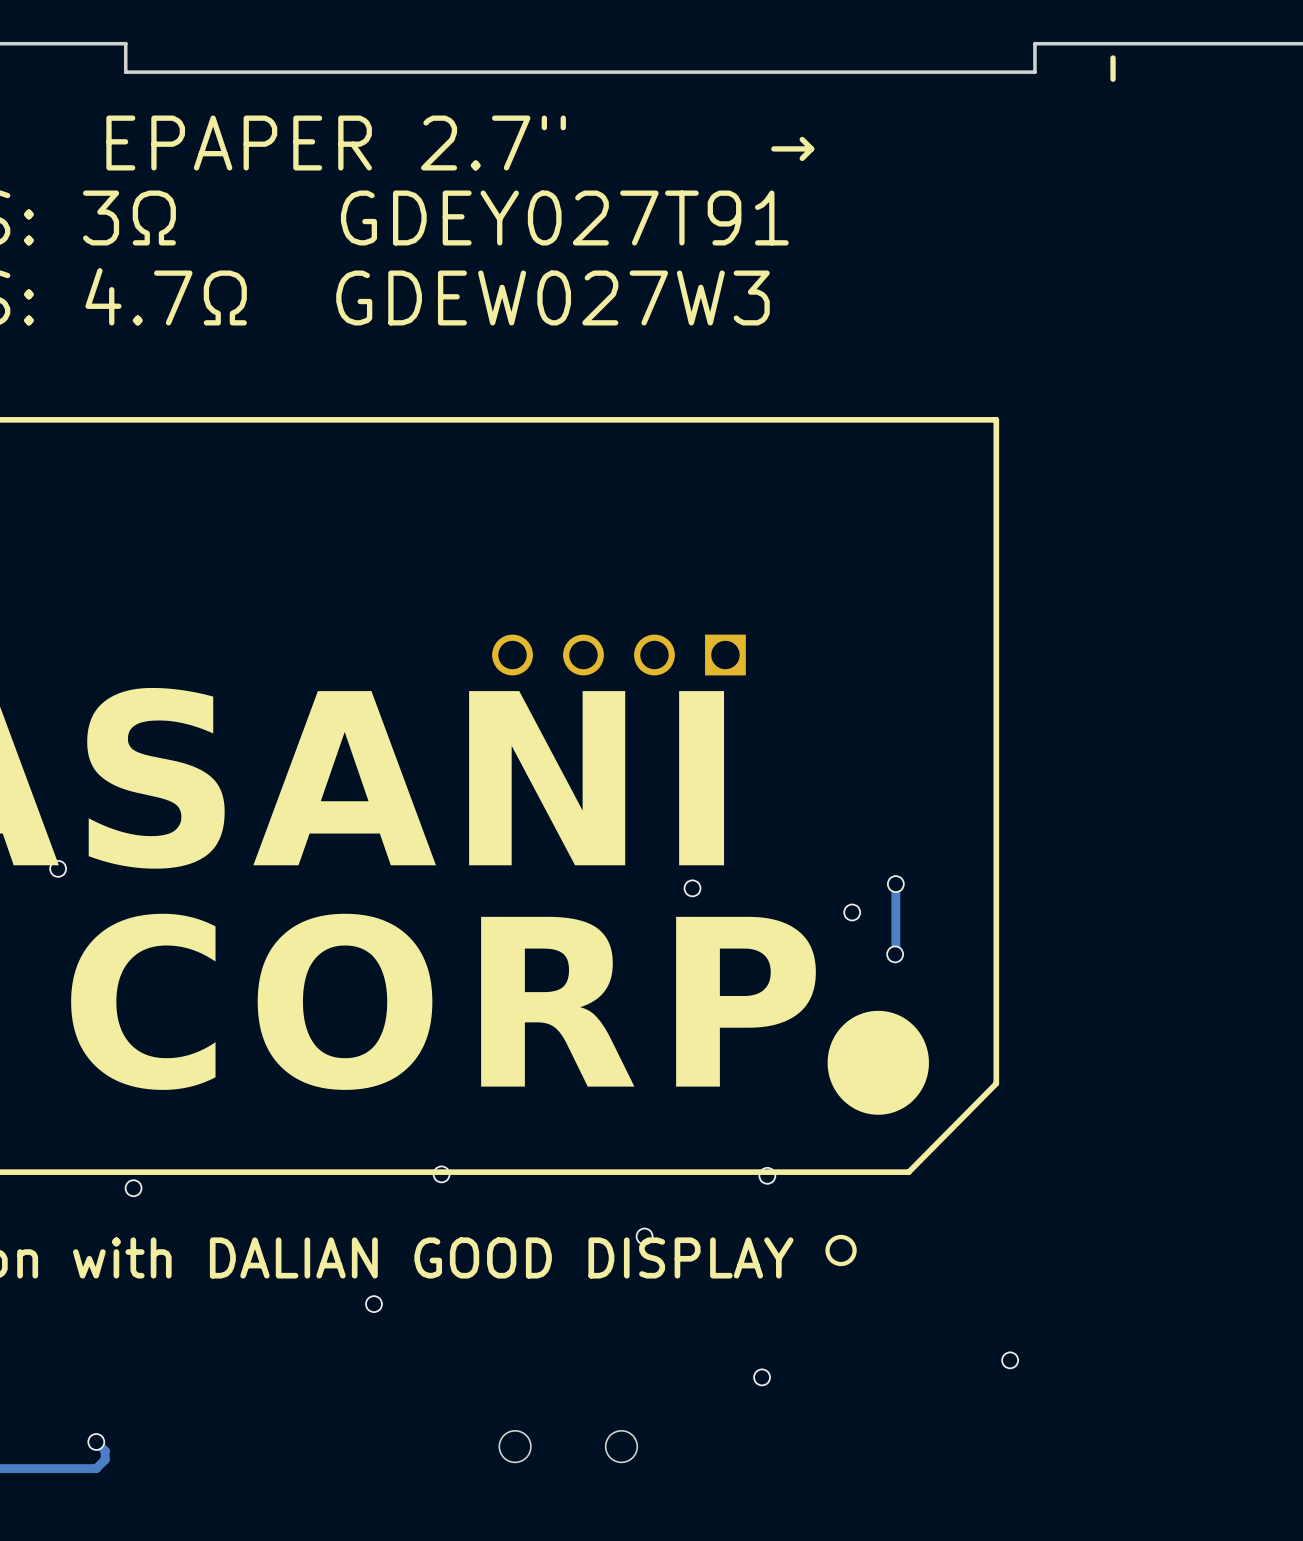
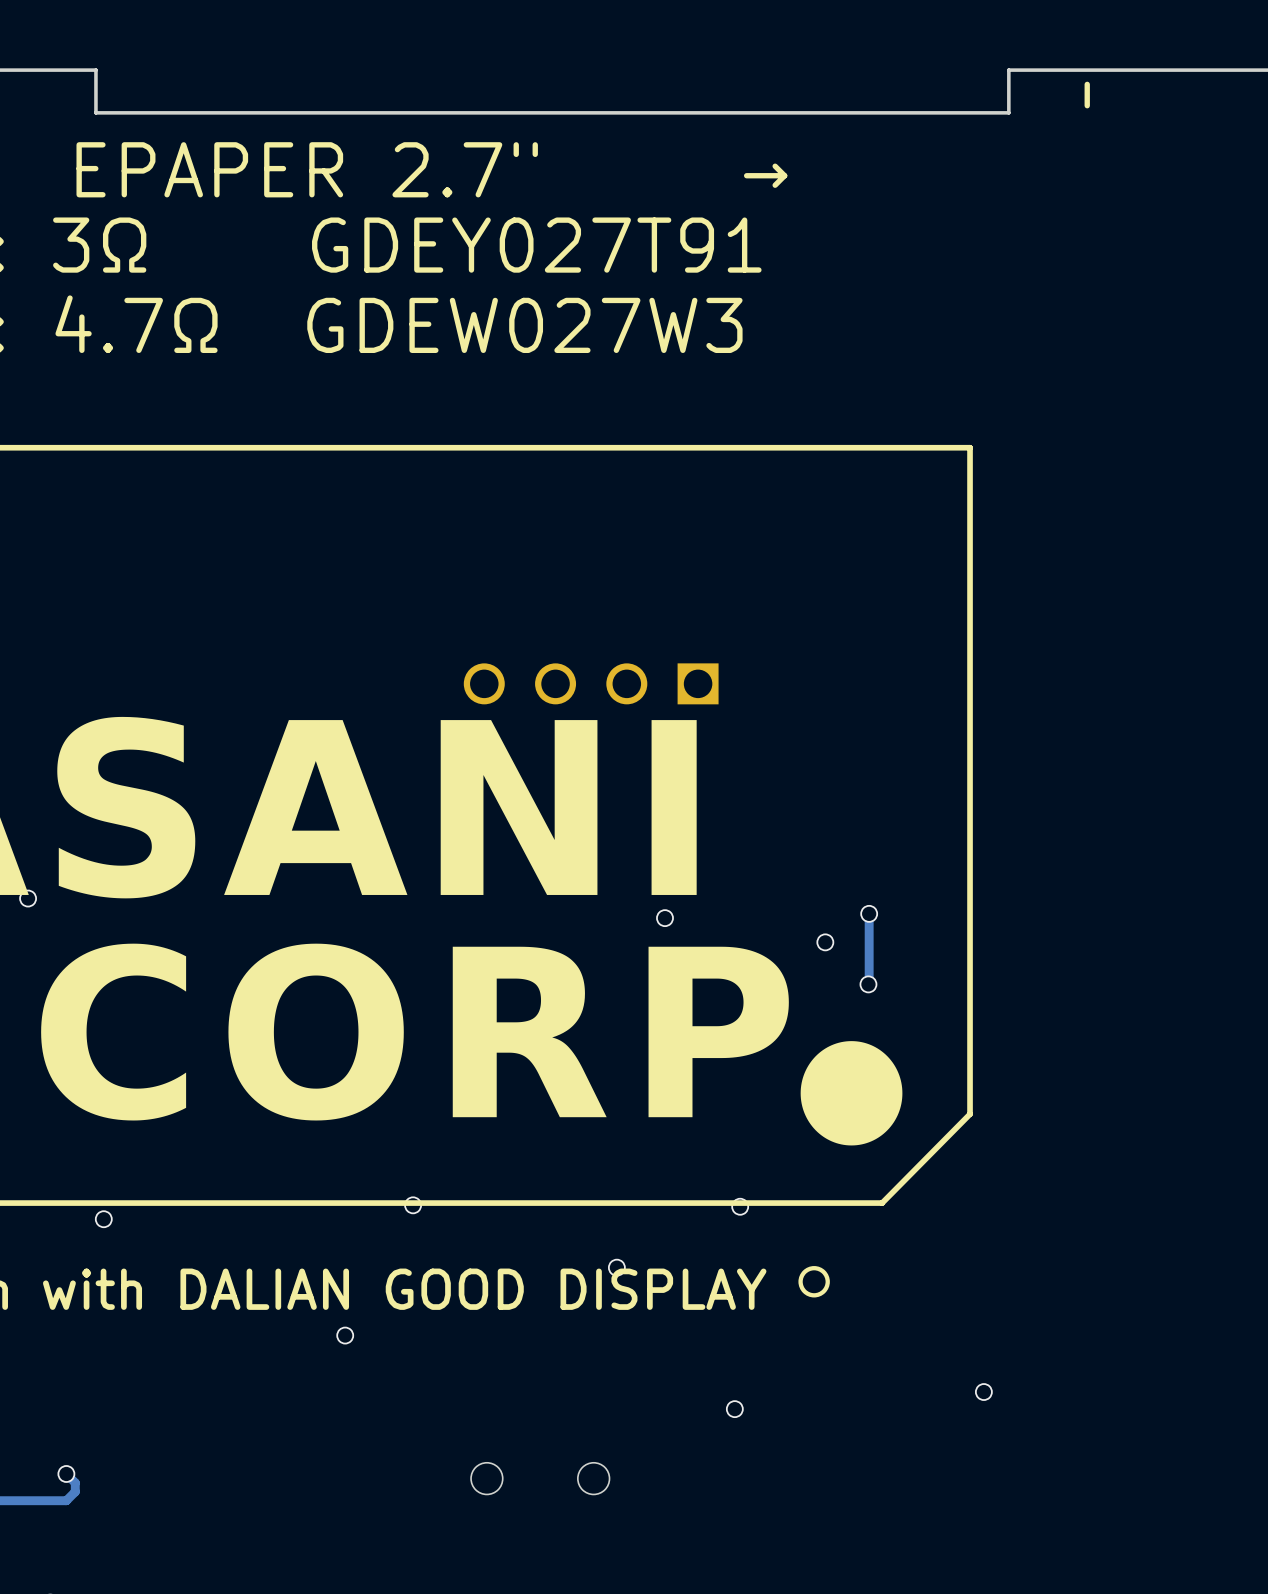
board edge: (1034, 72) (125, 72) -> (1008, 98) (1008, 112) (95, 112) (95, 98)

